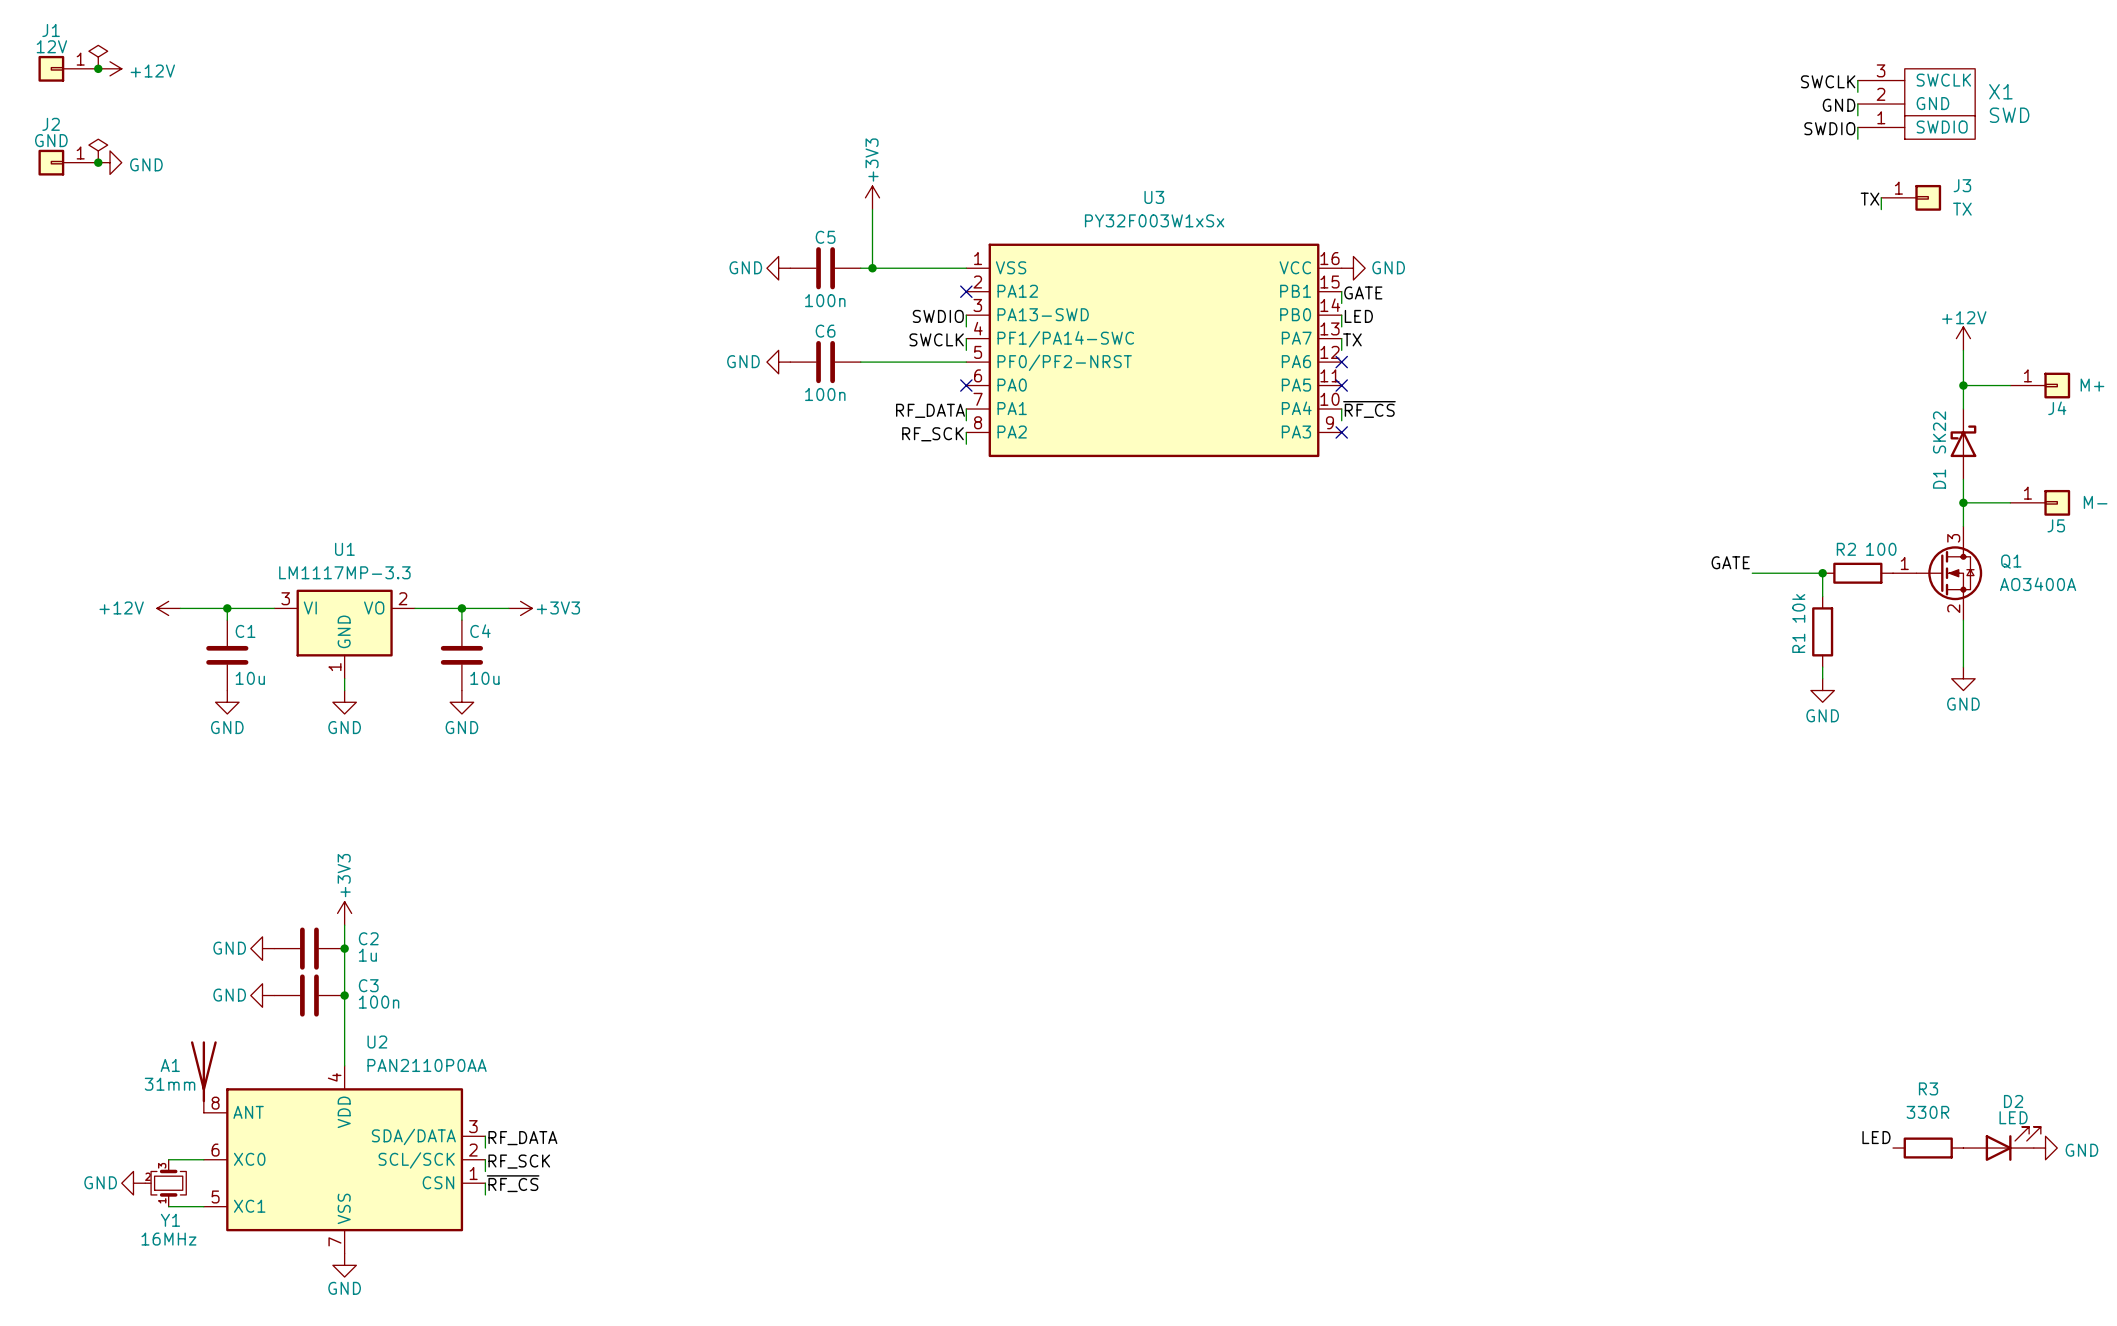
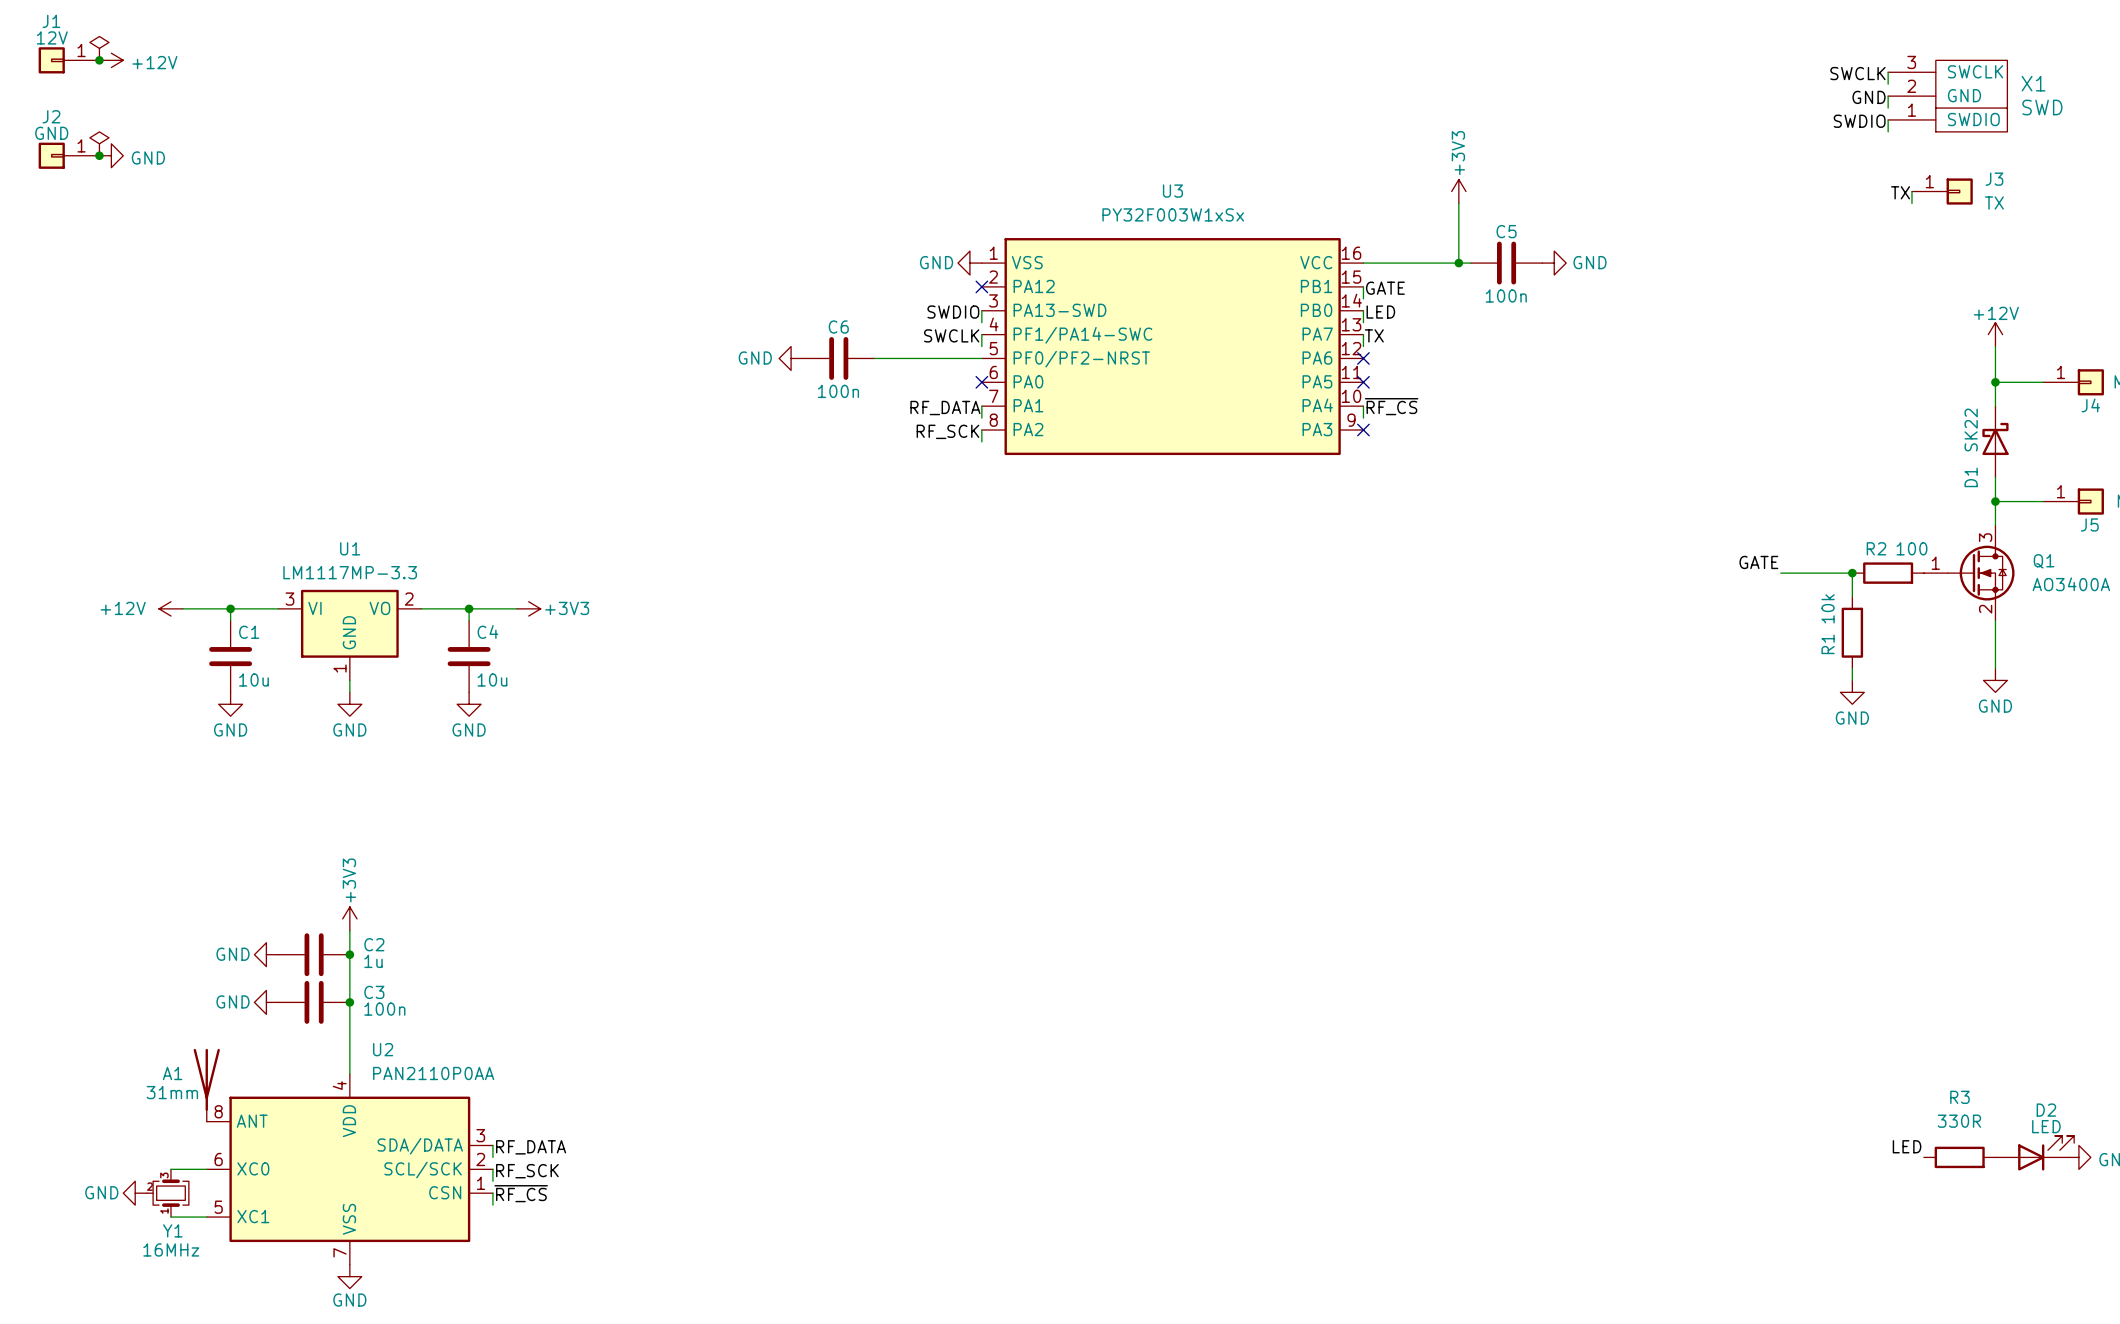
power symbol: +3V3 (872, 197) -> none
power symbol: none -> +3V3 (1458, 191)
wire: (872, 209) (872, 268) -> none
wire: none -> (1458, 203) (1458, 263)
power symbol position: GND (778, 268) -> GND (969, 263)
C5 position: (825, 268) -> (1506, 263)
wire: (860, 268) (966, 268) -> none
junction: (872, 268) -> none
wire: none -> (1363, 263) (1470, 263)
power symbol position: GND (1353, 268) -> GND (1554, 263)
junction: none -> (1458, 263)

